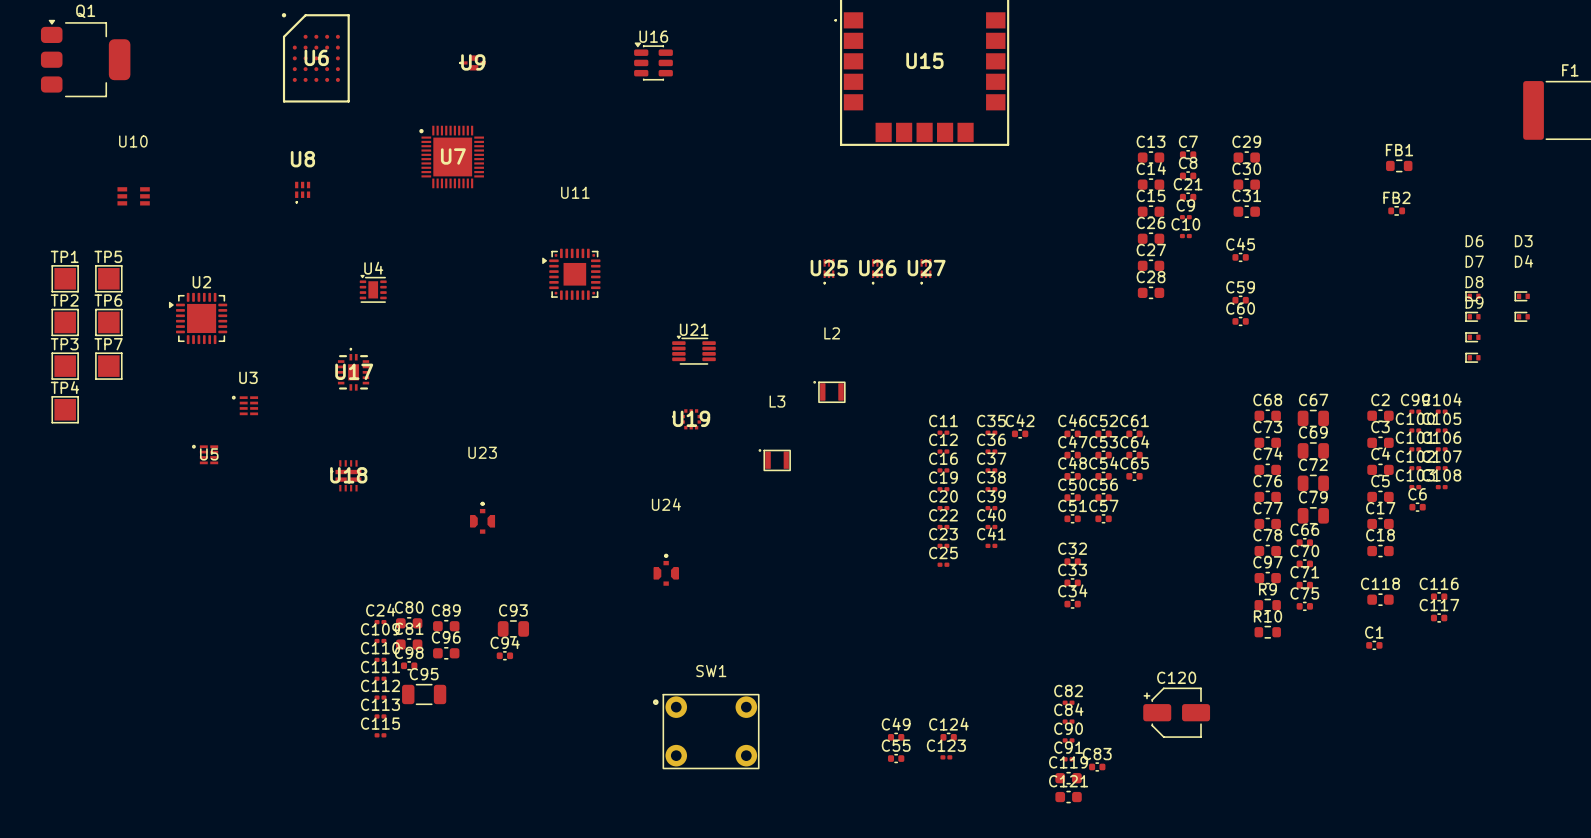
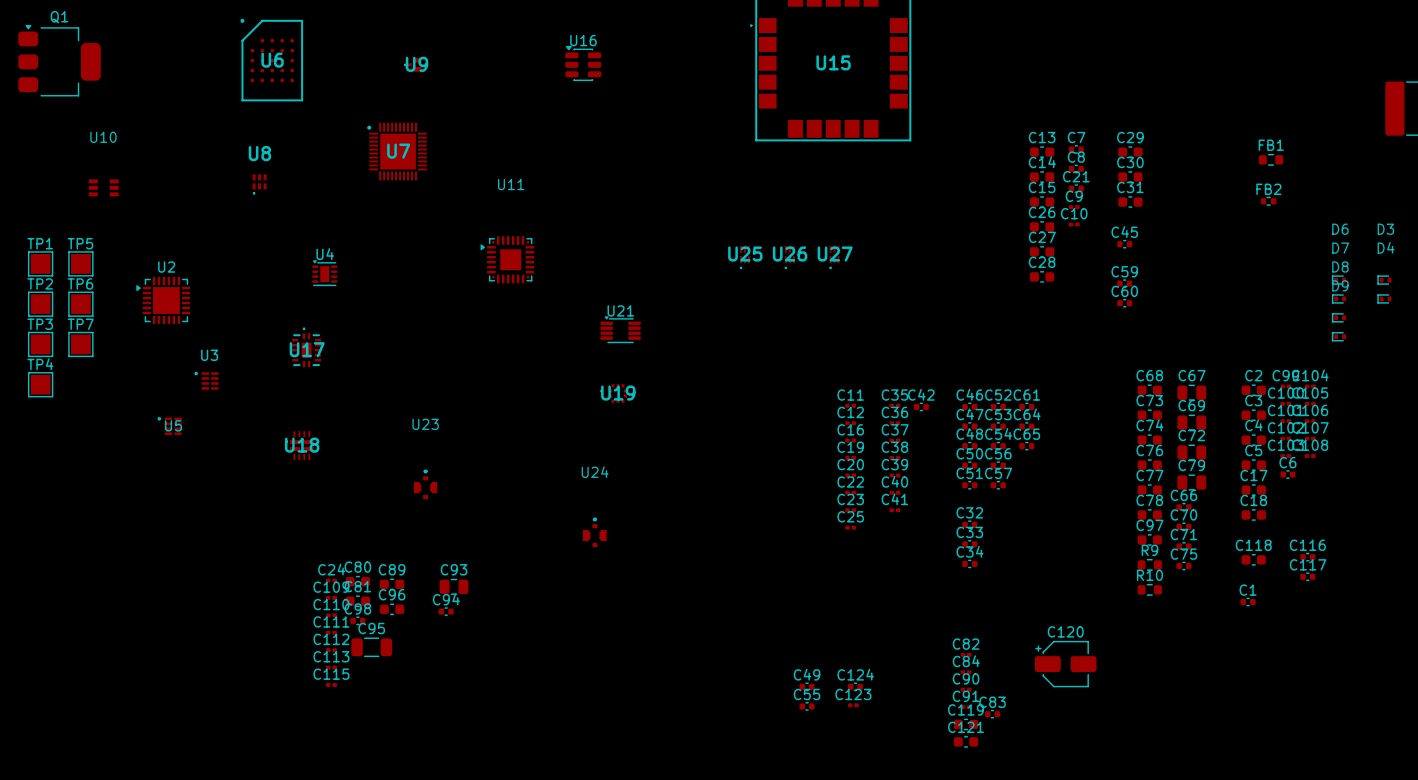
L2: (829, 391) -> none
L3: (774, 460) -> none
SW1: (706, 731) -> none

